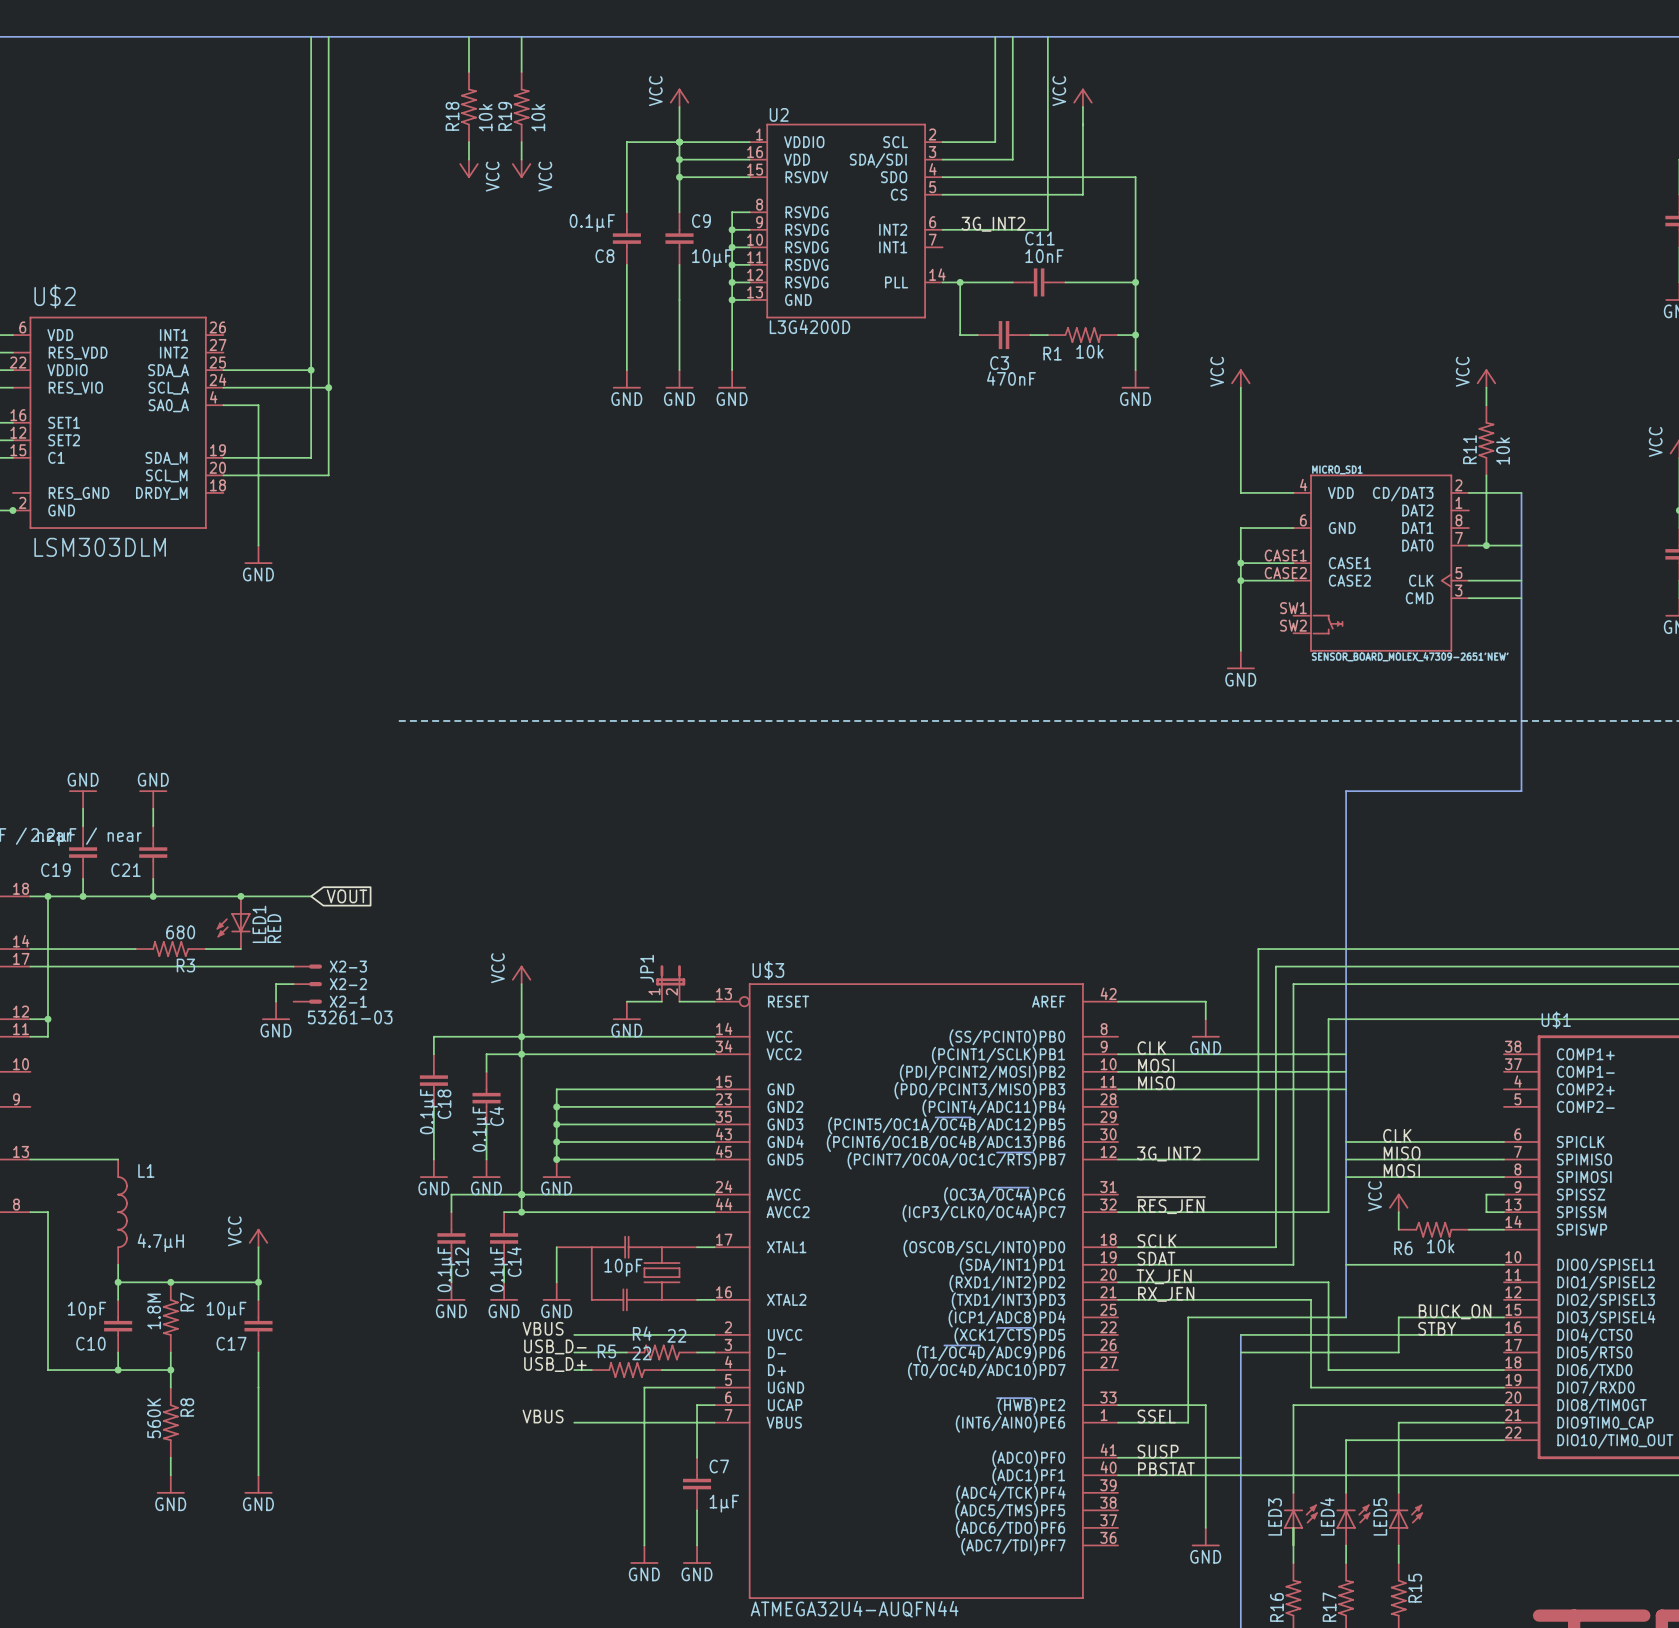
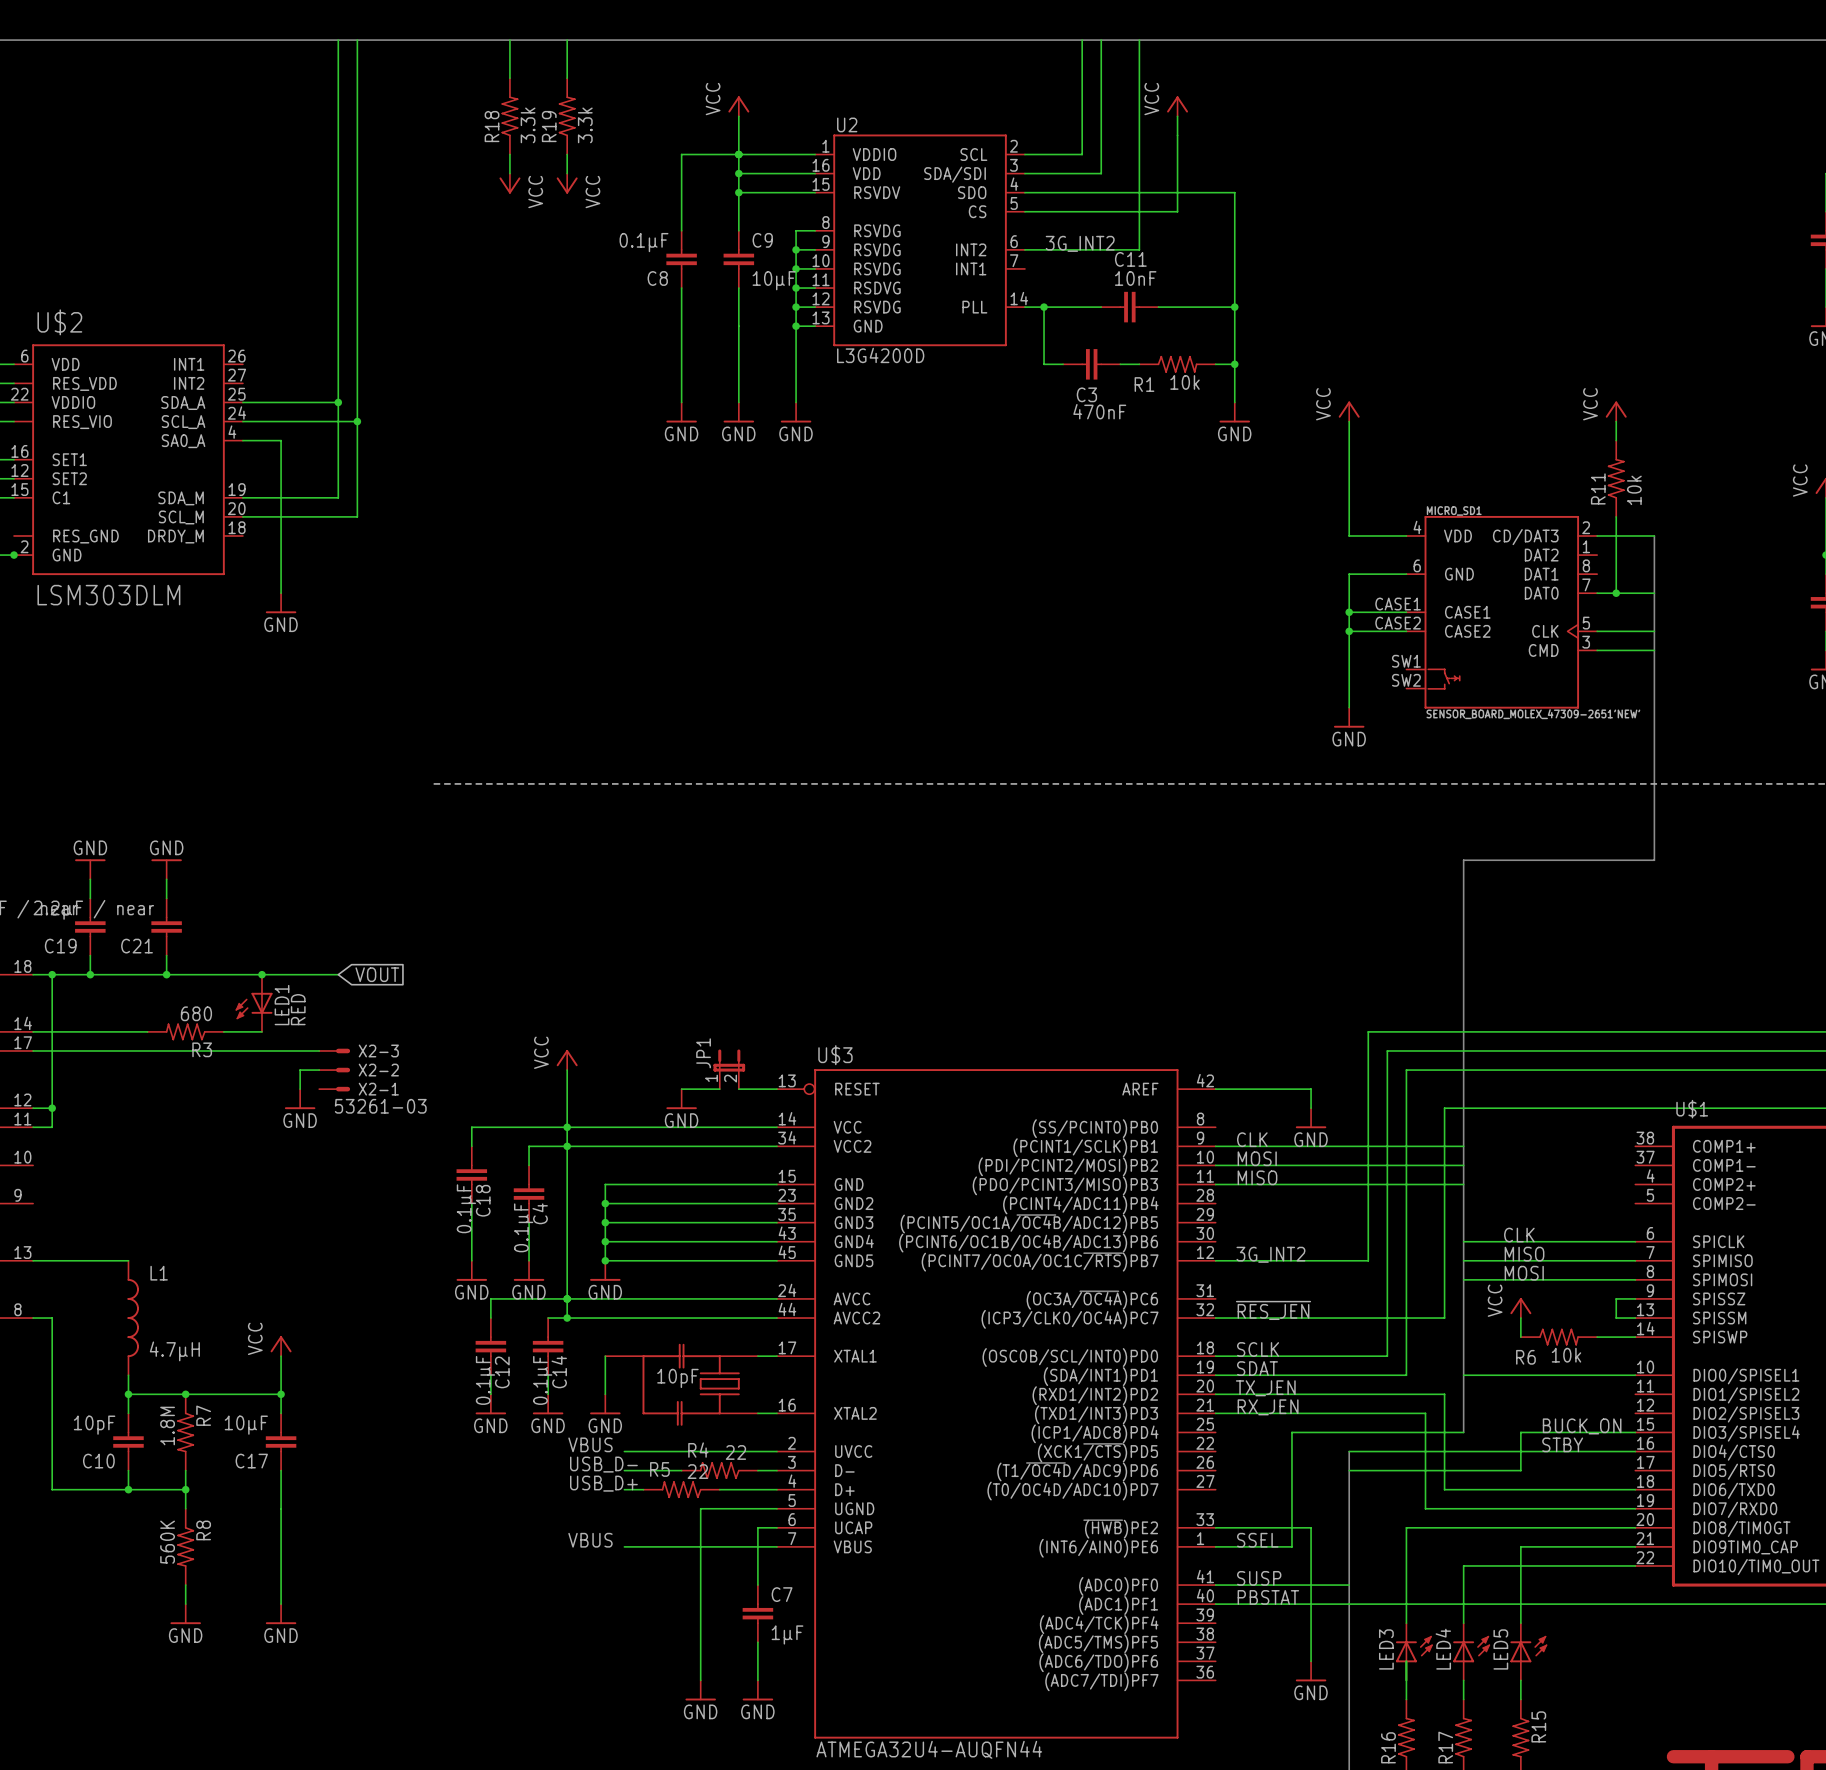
R18 value: 10k (485, 117) -> 3.3k (528, 125)
R19 value: 10k (538, 117) -> 3.3k (585, 125)

